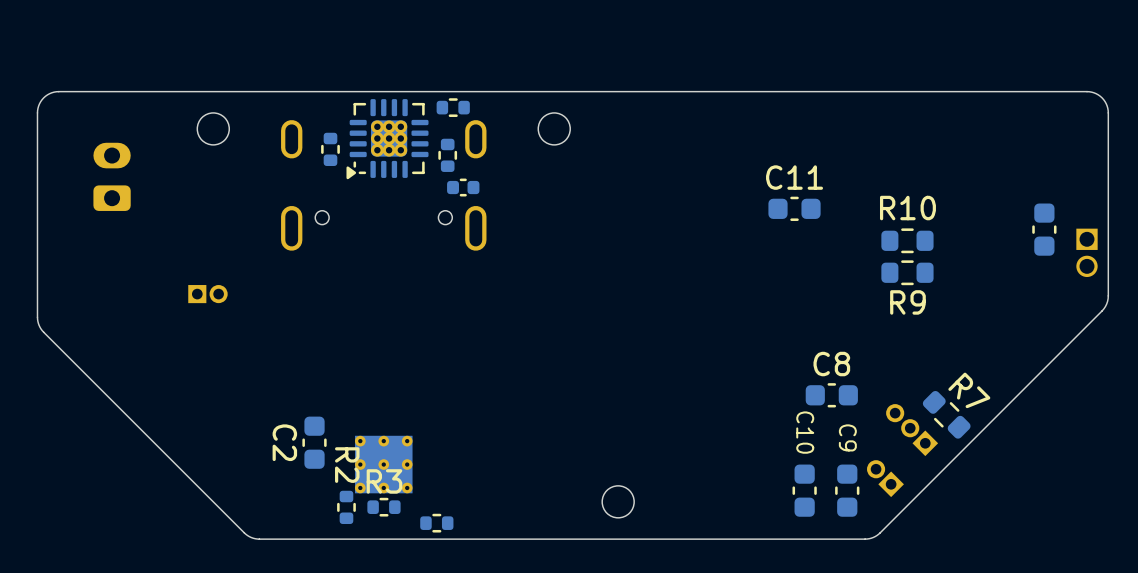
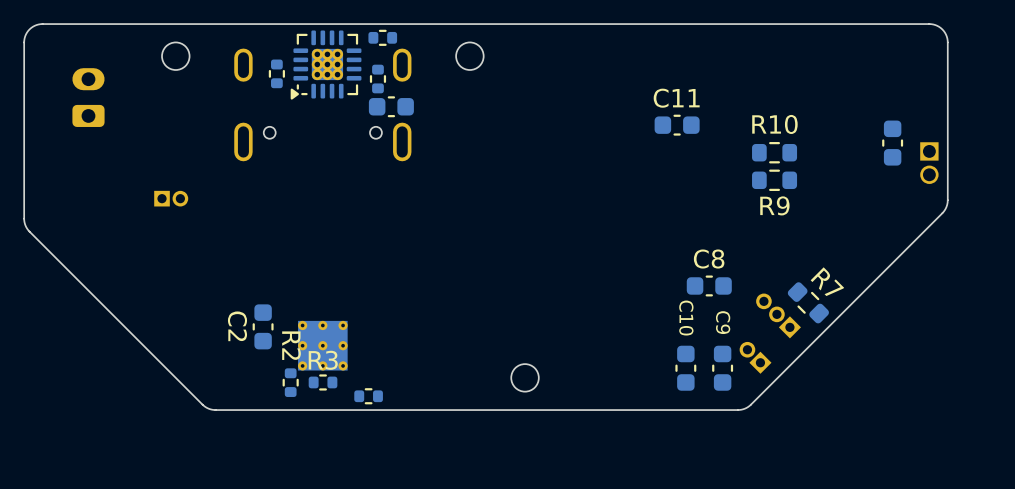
part footprint: [447, 178, 480, 197] -> [368, 96, 414, 118]

